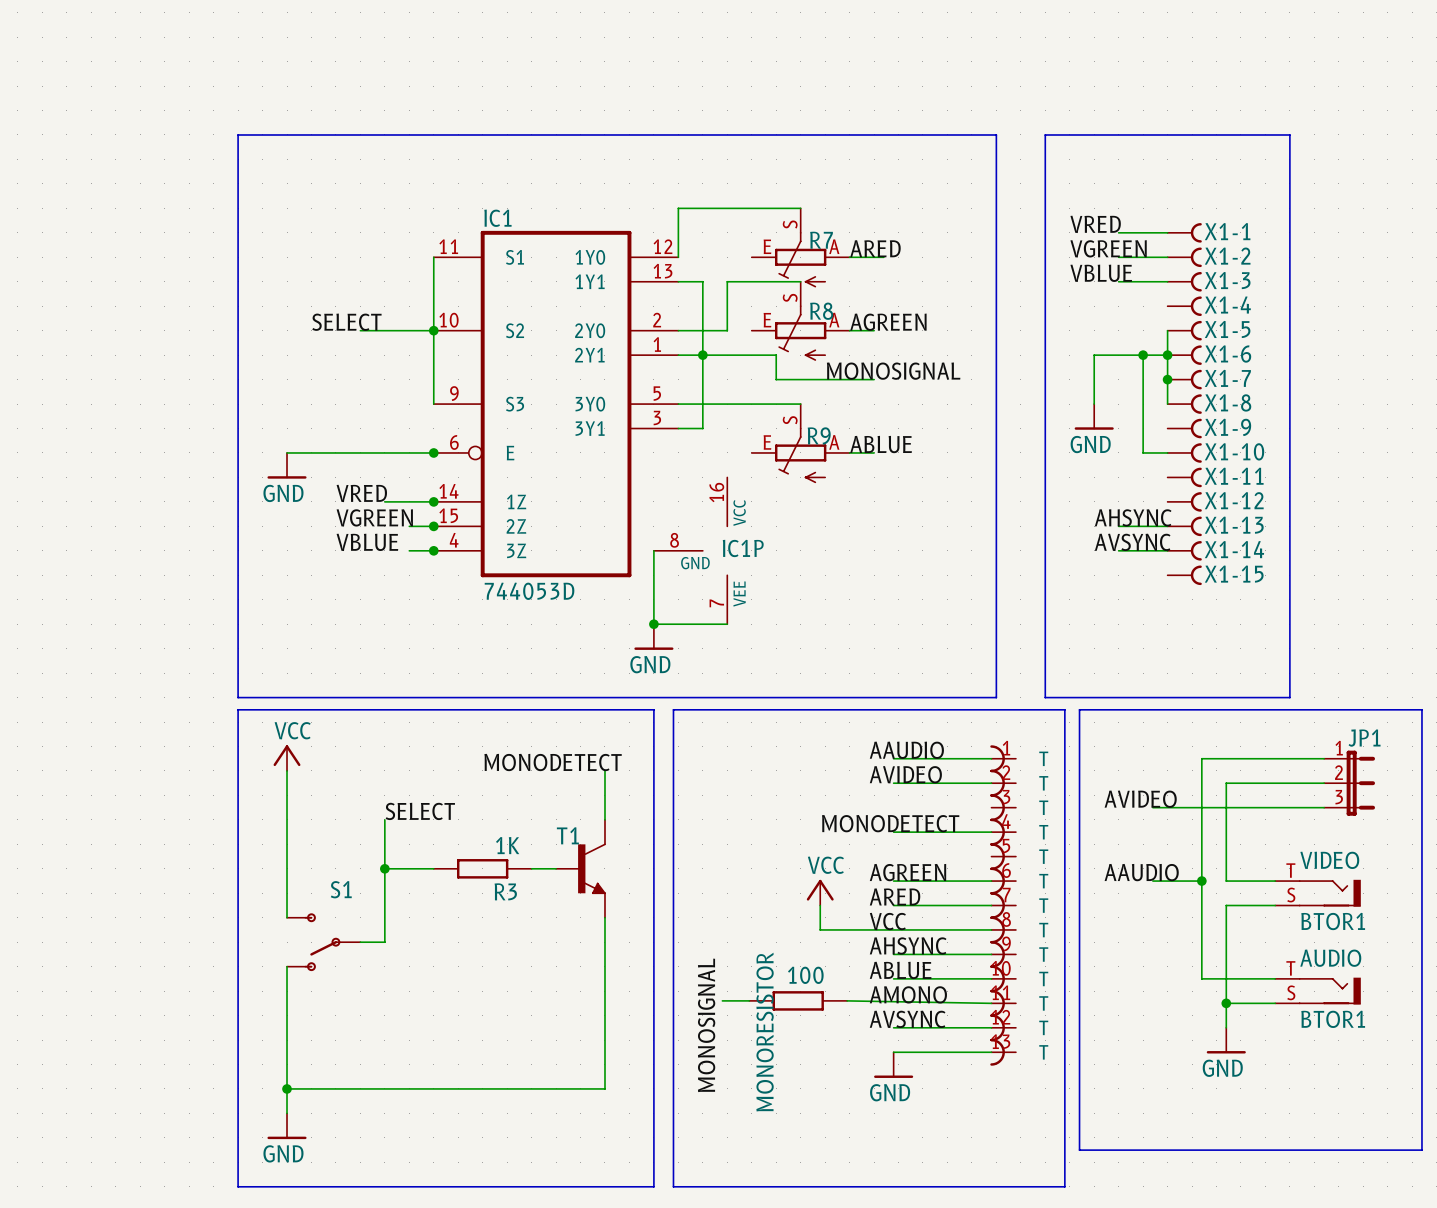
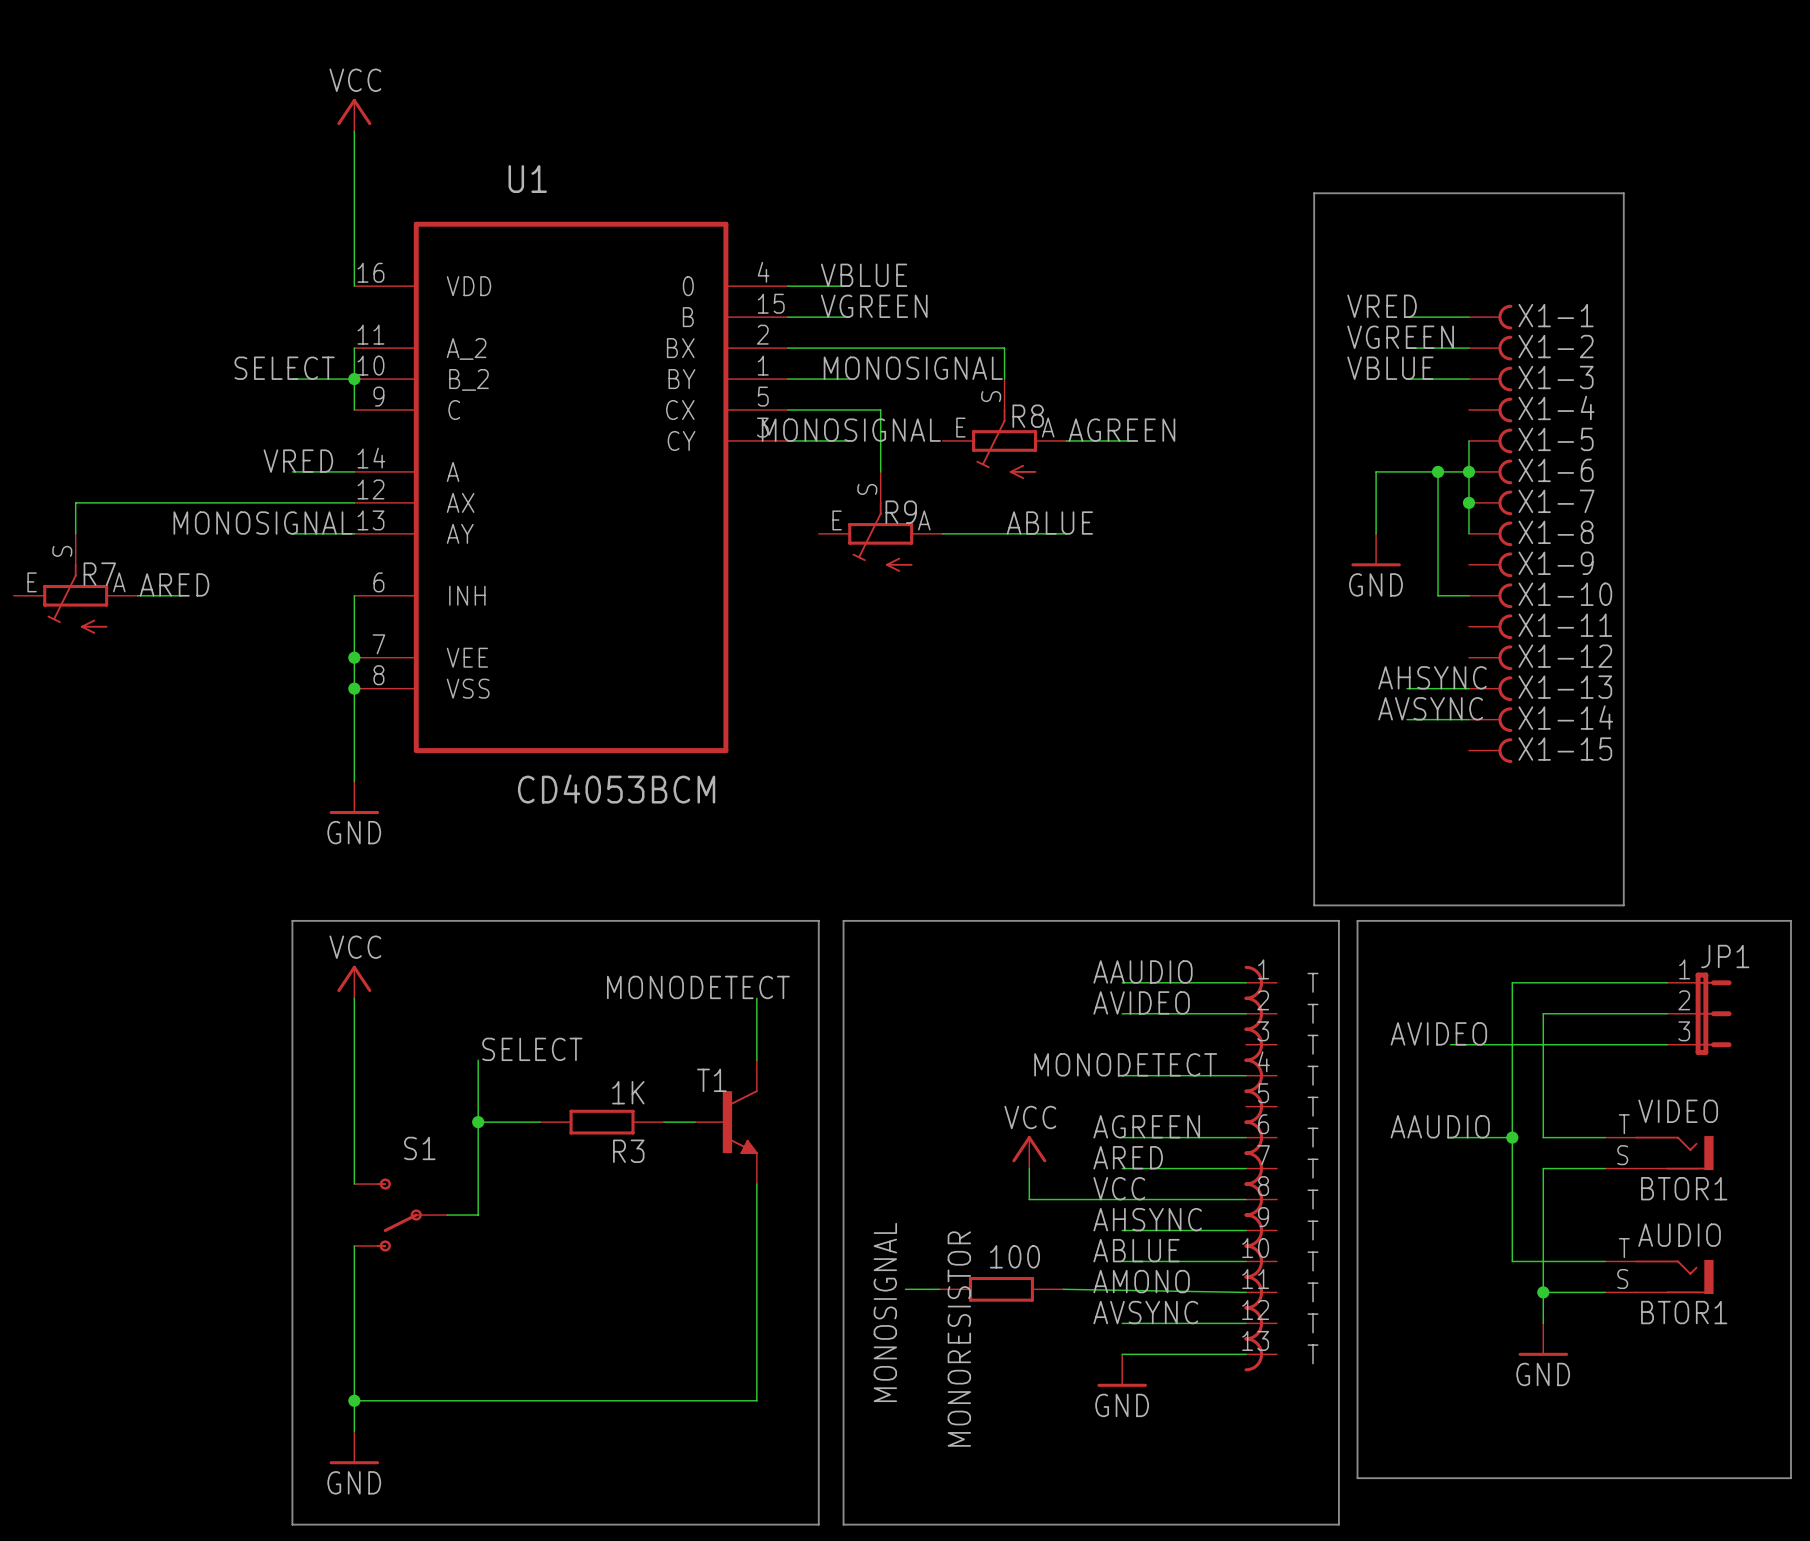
power symbol: none -> VCC (354, 115)
wire: none -> (354, 131) (354, 286)
line: (238, 134) (996, 134) (996, 697) (238, 697) (238, 134) -> none
label: none -> VBLUE (864, 275)
wire: none -> (787, 286) (849, 286)
wire: (800, 208) (678, 208) (678, 257) -> none
label: none -> VGREEN (874, 306)
wire: none -> (787, 317) (849, 317)
R7 position: (800, 247) -> (75, 583)
label: ARED (875, 248) -> none
wire: none -> (354, 348) (354, 410)
wire: (433, 257) (433, 404) -> none
wire: (849, 257) (883, 257) -> none
label: none -> MONOSIGNAL (913, 368)
wire: none -> (292, 379) (354, 379)
junction: none -> (354, 379)
wire: (678, 281) (702, 281) (702, 306) -> (787, 410) (880, 410)
wire: (800, 281) (727, 281) (727, 330) (678, 330) -> (1004, 379) (1004, 348) (787, 348)
label position: SELECT (346, 322) -> SELECT (284, 368)
label: none -> MONOSIGNAL (851, 430)
wire: (360, 330) (433, 330) -> none
junction: (433, 330) -> none
wire: none -> (292, 471) (354, 471)
wire: (678, 355) (776, 355) (776, 379) (874, 379) -> none
wire: (702, 355) (702, 428) (678, 428) -> none
junction: (702, 355) -> none
U1: none -> CD4053BCM (571, 487)
label: MONOSIGNAL (893, 371) -> none
wire: none -> (354, 502) (75, 502) (75, 533)
label: none -> MONOSIGNAL (263, 523)
IC1: 744053D (556, 404) -> none
wire: (678, 404) (751, 404) -> none
wire: none -> (1004, 533) (1066, 533)
R9 position: (800, 443) -> (880, 521)
label: none -> ARED (174, 584)
label position: ABLUE (881, 444) -> ABLUE (1049, 523)
wire: none -> (137, 595) (180, 595)
wire: (287, 452) (433, 452) -> (354, 595) (354, 781)
junction: (433, 452) -> none
wire: (849, 452) (874, 452) -> (1097, 440) (1128, 440)
power symbol position: GND (287, 465) -> GND (354, 797)
label position: VRED (361, 493) -> VRED (298, 461)
junction: none -> (354, 657)
wire: (384, 501) (433, 501) -> (292, 533) (354, 533)
junction: (433, 501) -> none
label: VGREEN (374, 517) -> none
junction: none -> (354, 688)
wire: (409, 526) (433, 526) -> none
junction: (433, 526) -> none
label: VBLUE (367, 542) -> none
wire: (409, 550) (433, 550) -> none
junction: (433, 550) -> none
wire: (653, 550) (653, 624) (727, 624) -> none
IC1P: (690, 550) -> none
junction: (653, 624) -> none
power symbol: GND (653, 637) -> none

